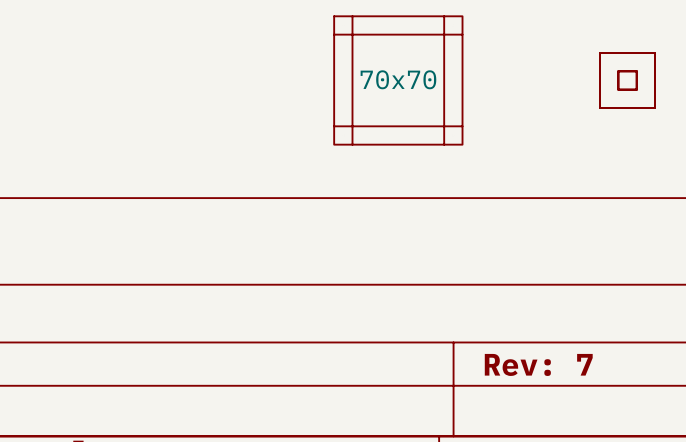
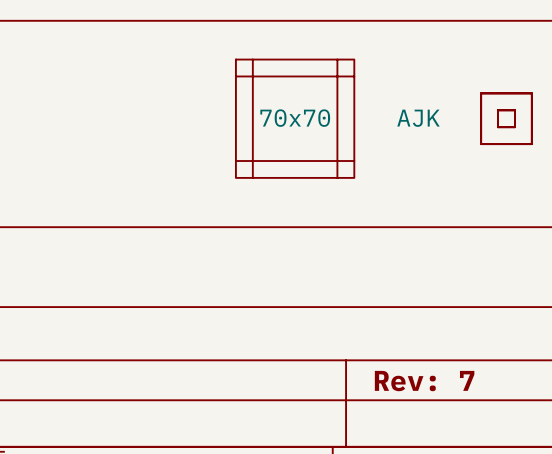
part: none -> AJK (418, 118)

